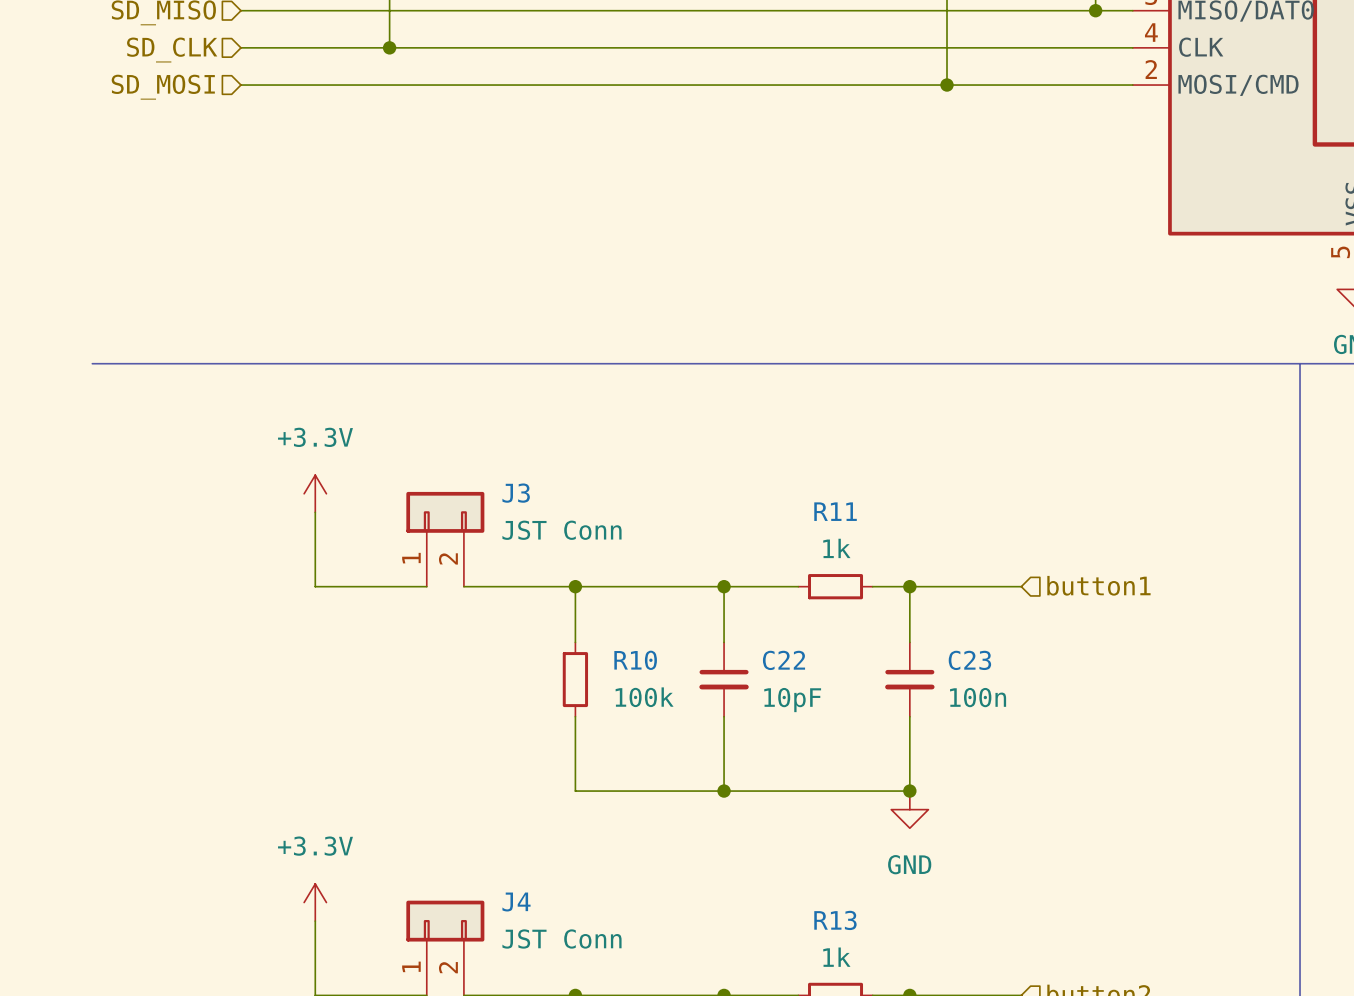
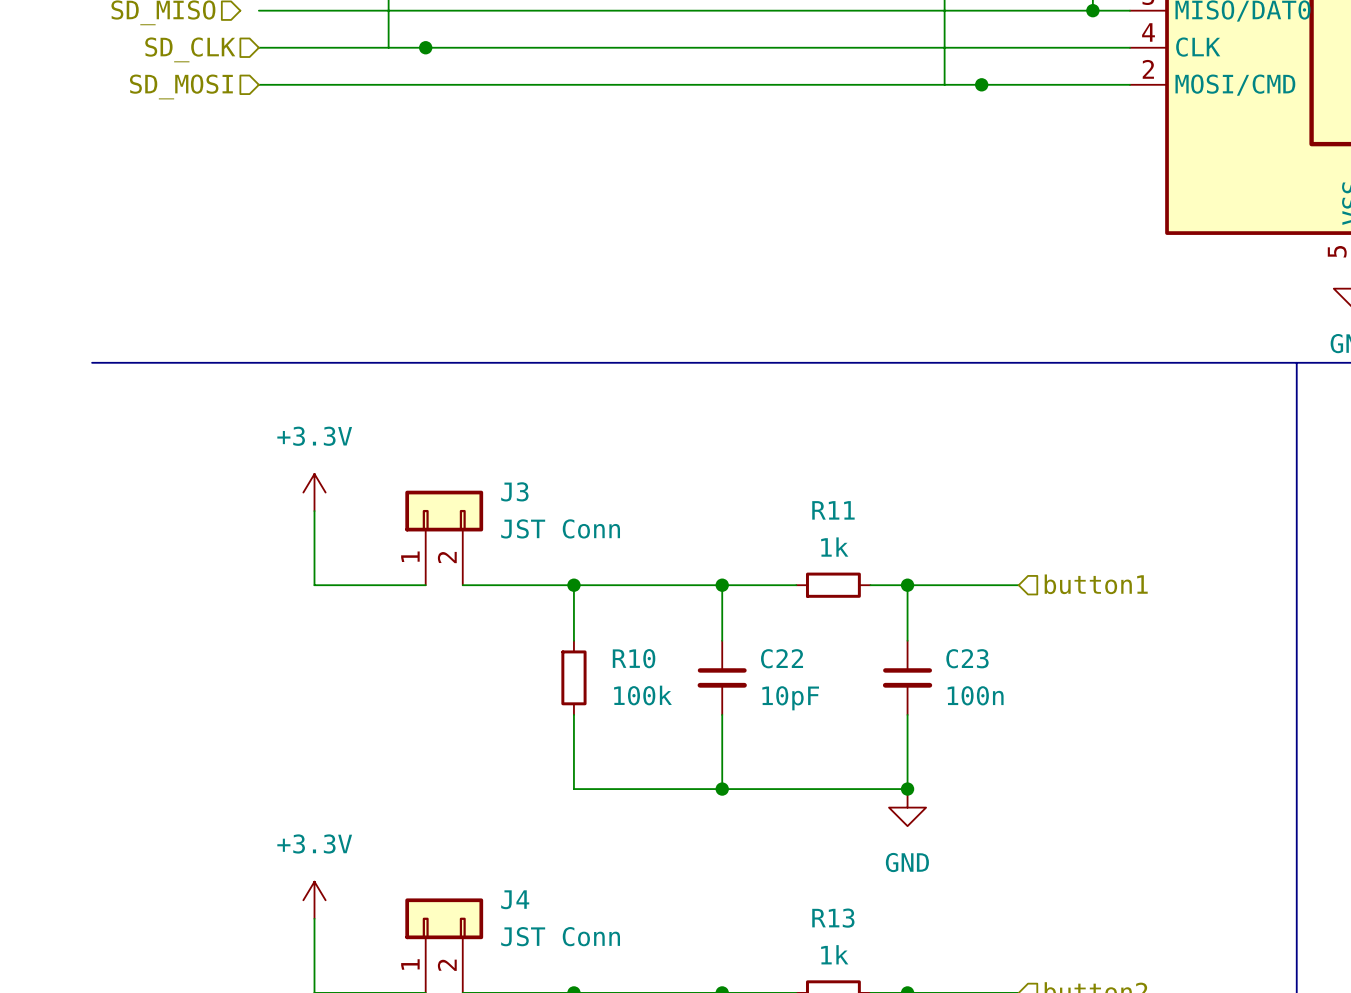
wire: (240, 10) (259, 10) -> none
wire: (240, 47) (259, 47) -> none
junction position: (389, 47) -> (425, 47)
hierarchical label position: SD_CLK (172, 50) -> SD_CLK (190, 49)
wire: (240, 85) (259, 85) -> none
junction position: (947, 85) -> (981, 84)
hierarchical label position: SD_MOSI (163, 87) -> SD_MOSI (181, 86)

